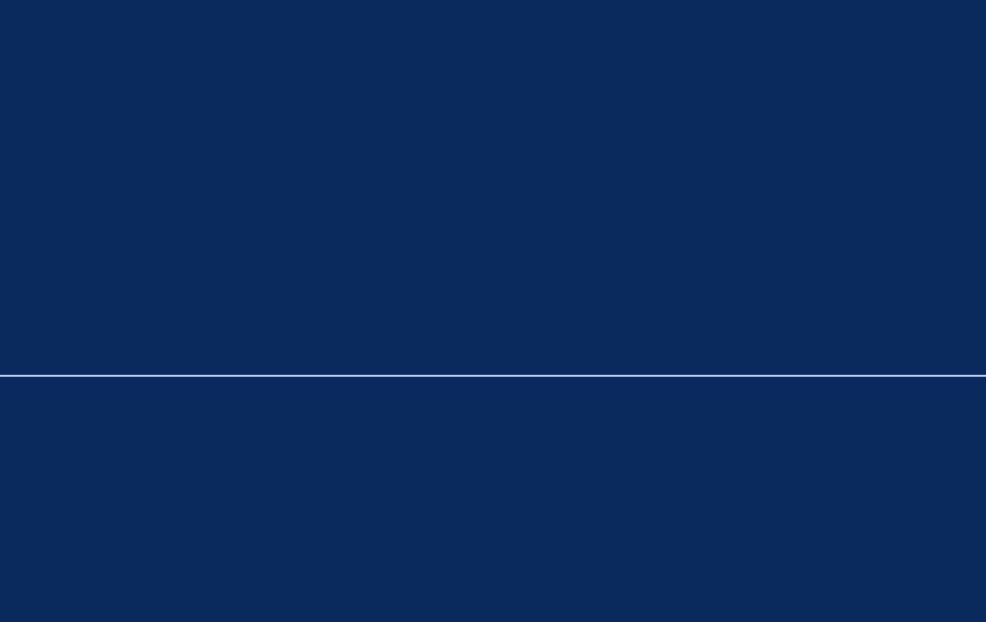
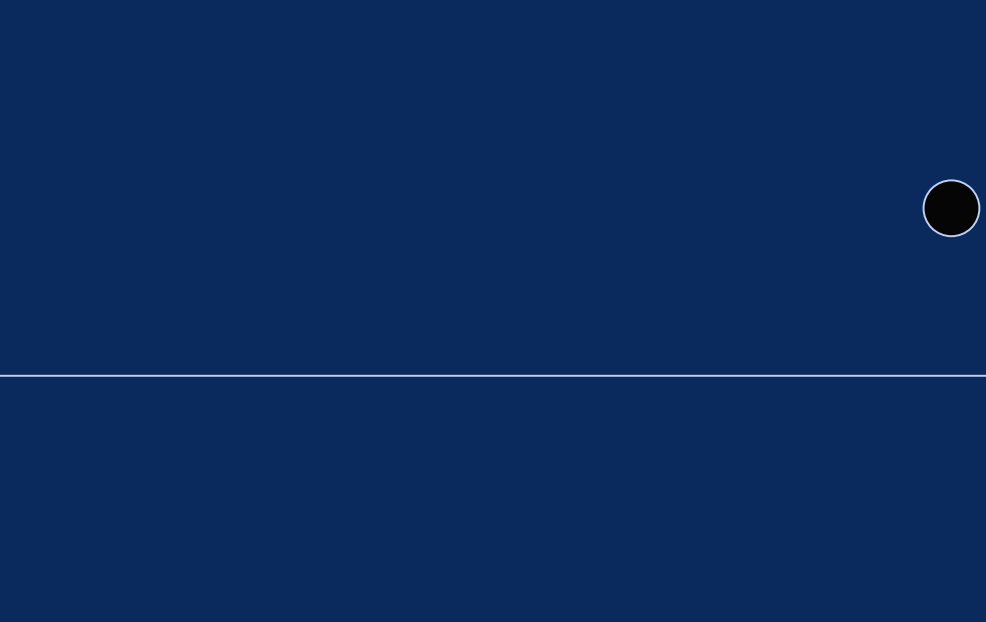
hole: none -> (951, 208)

